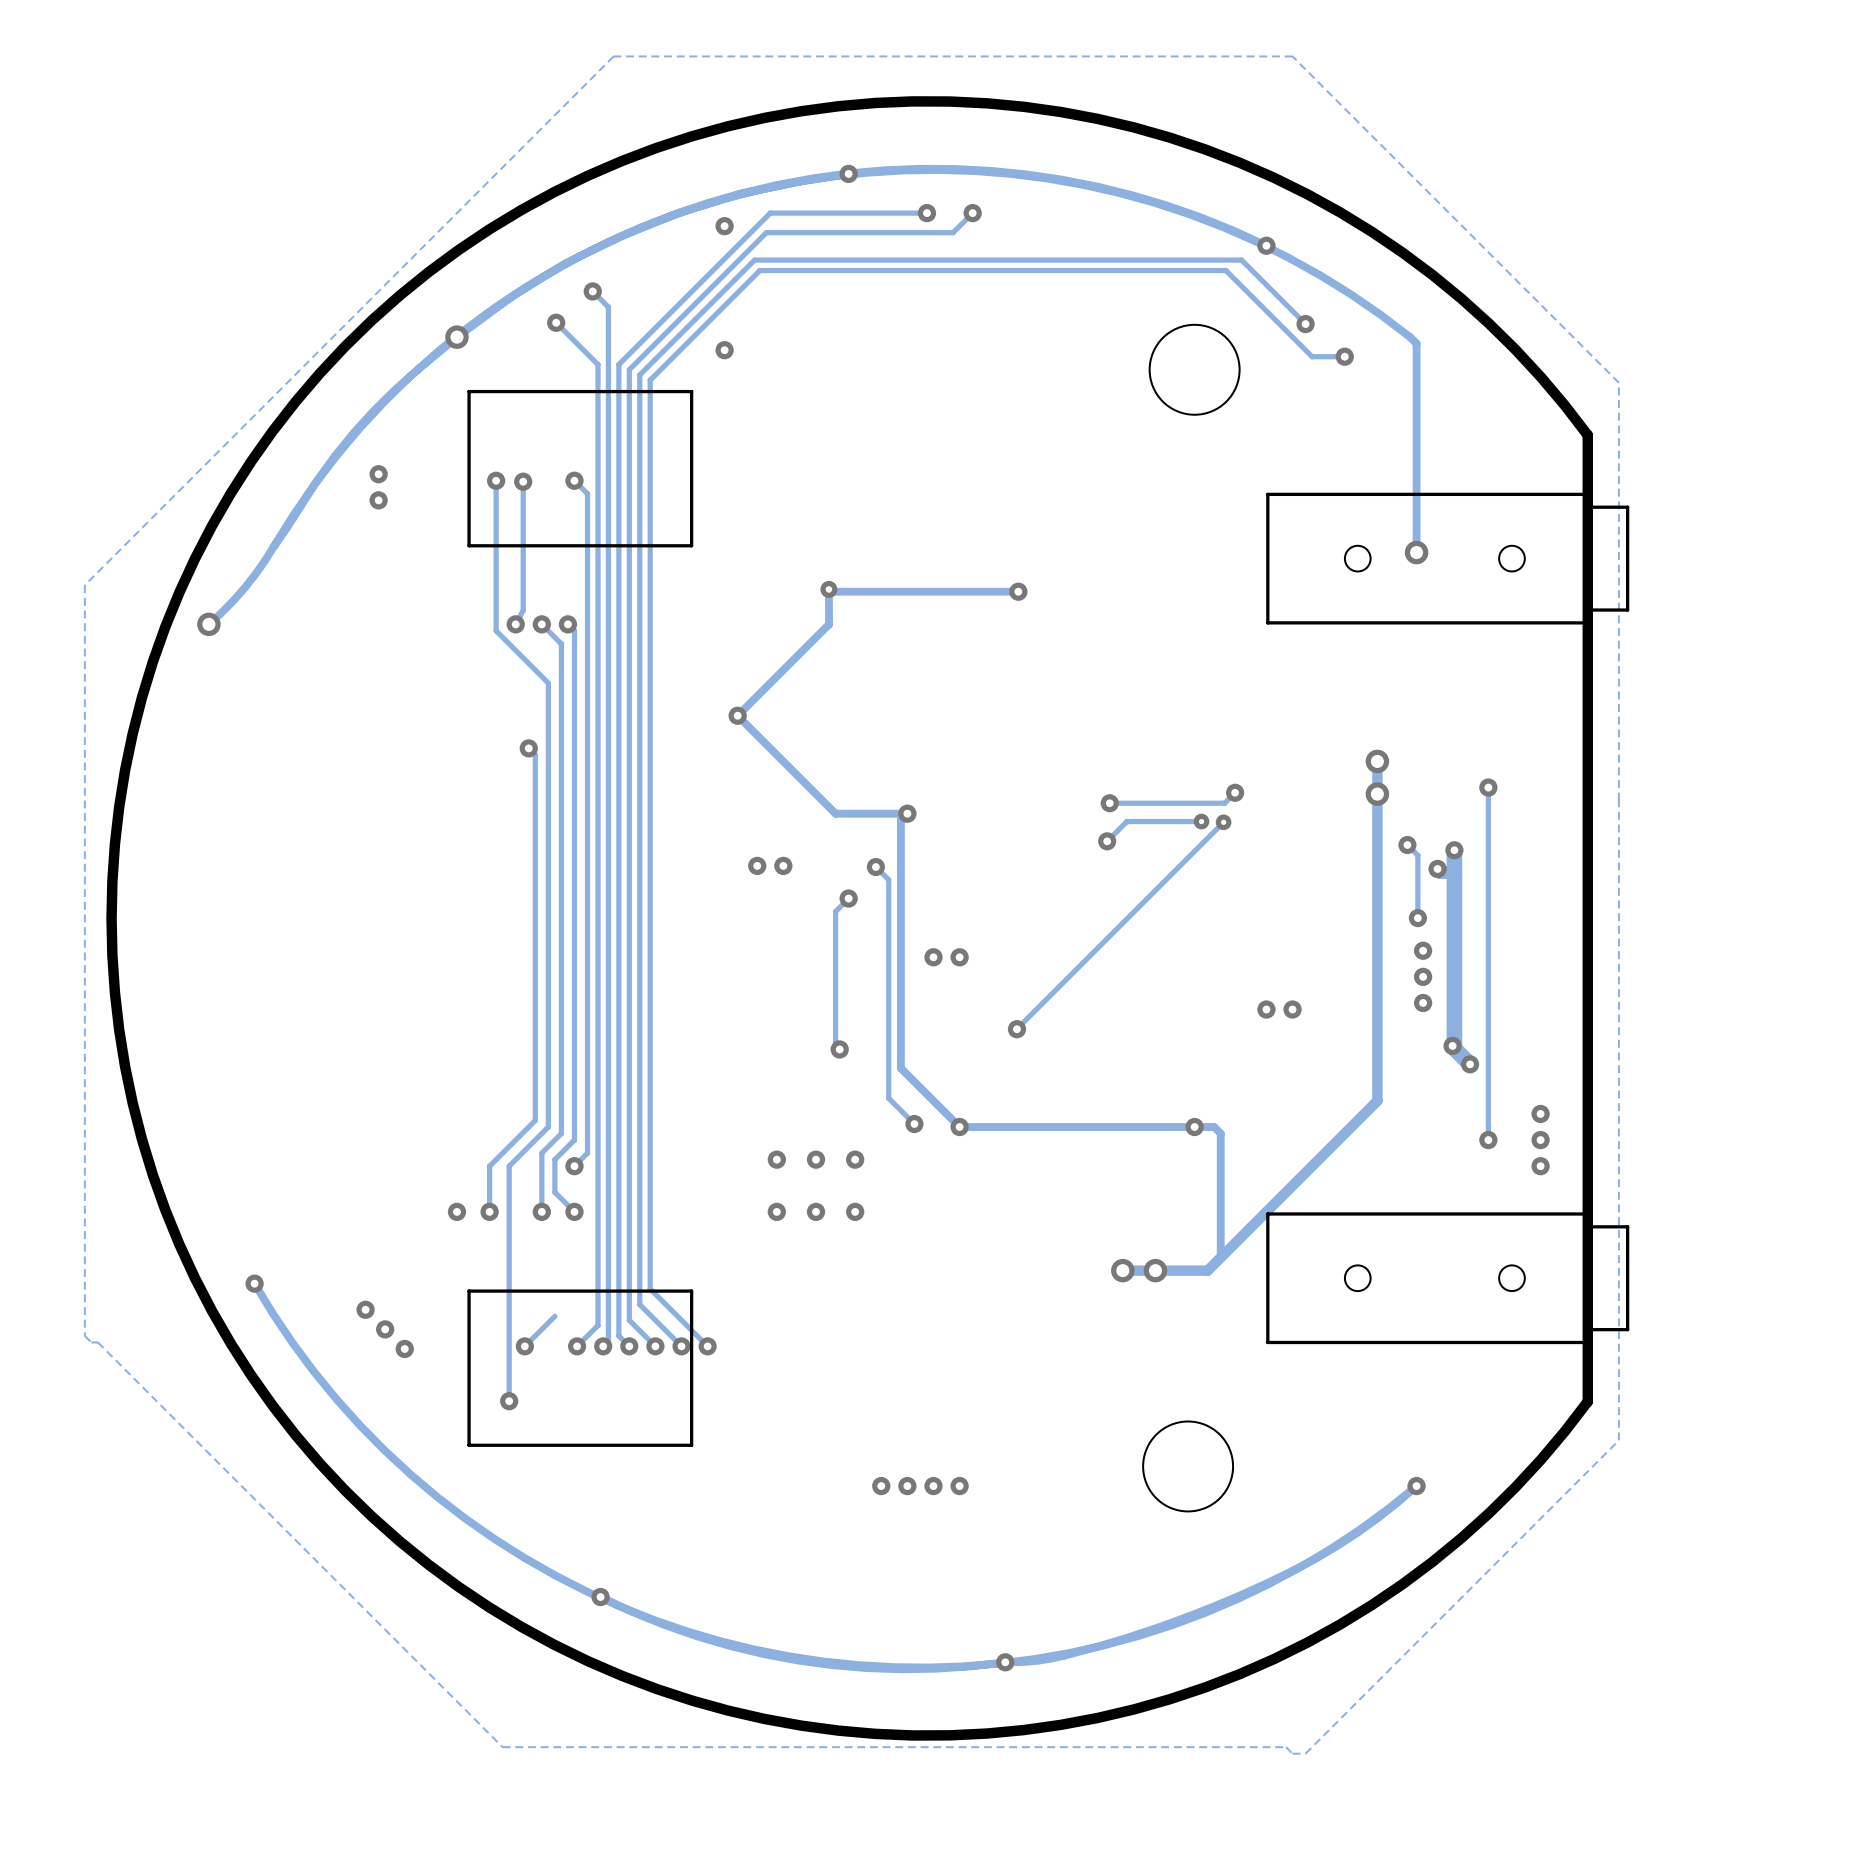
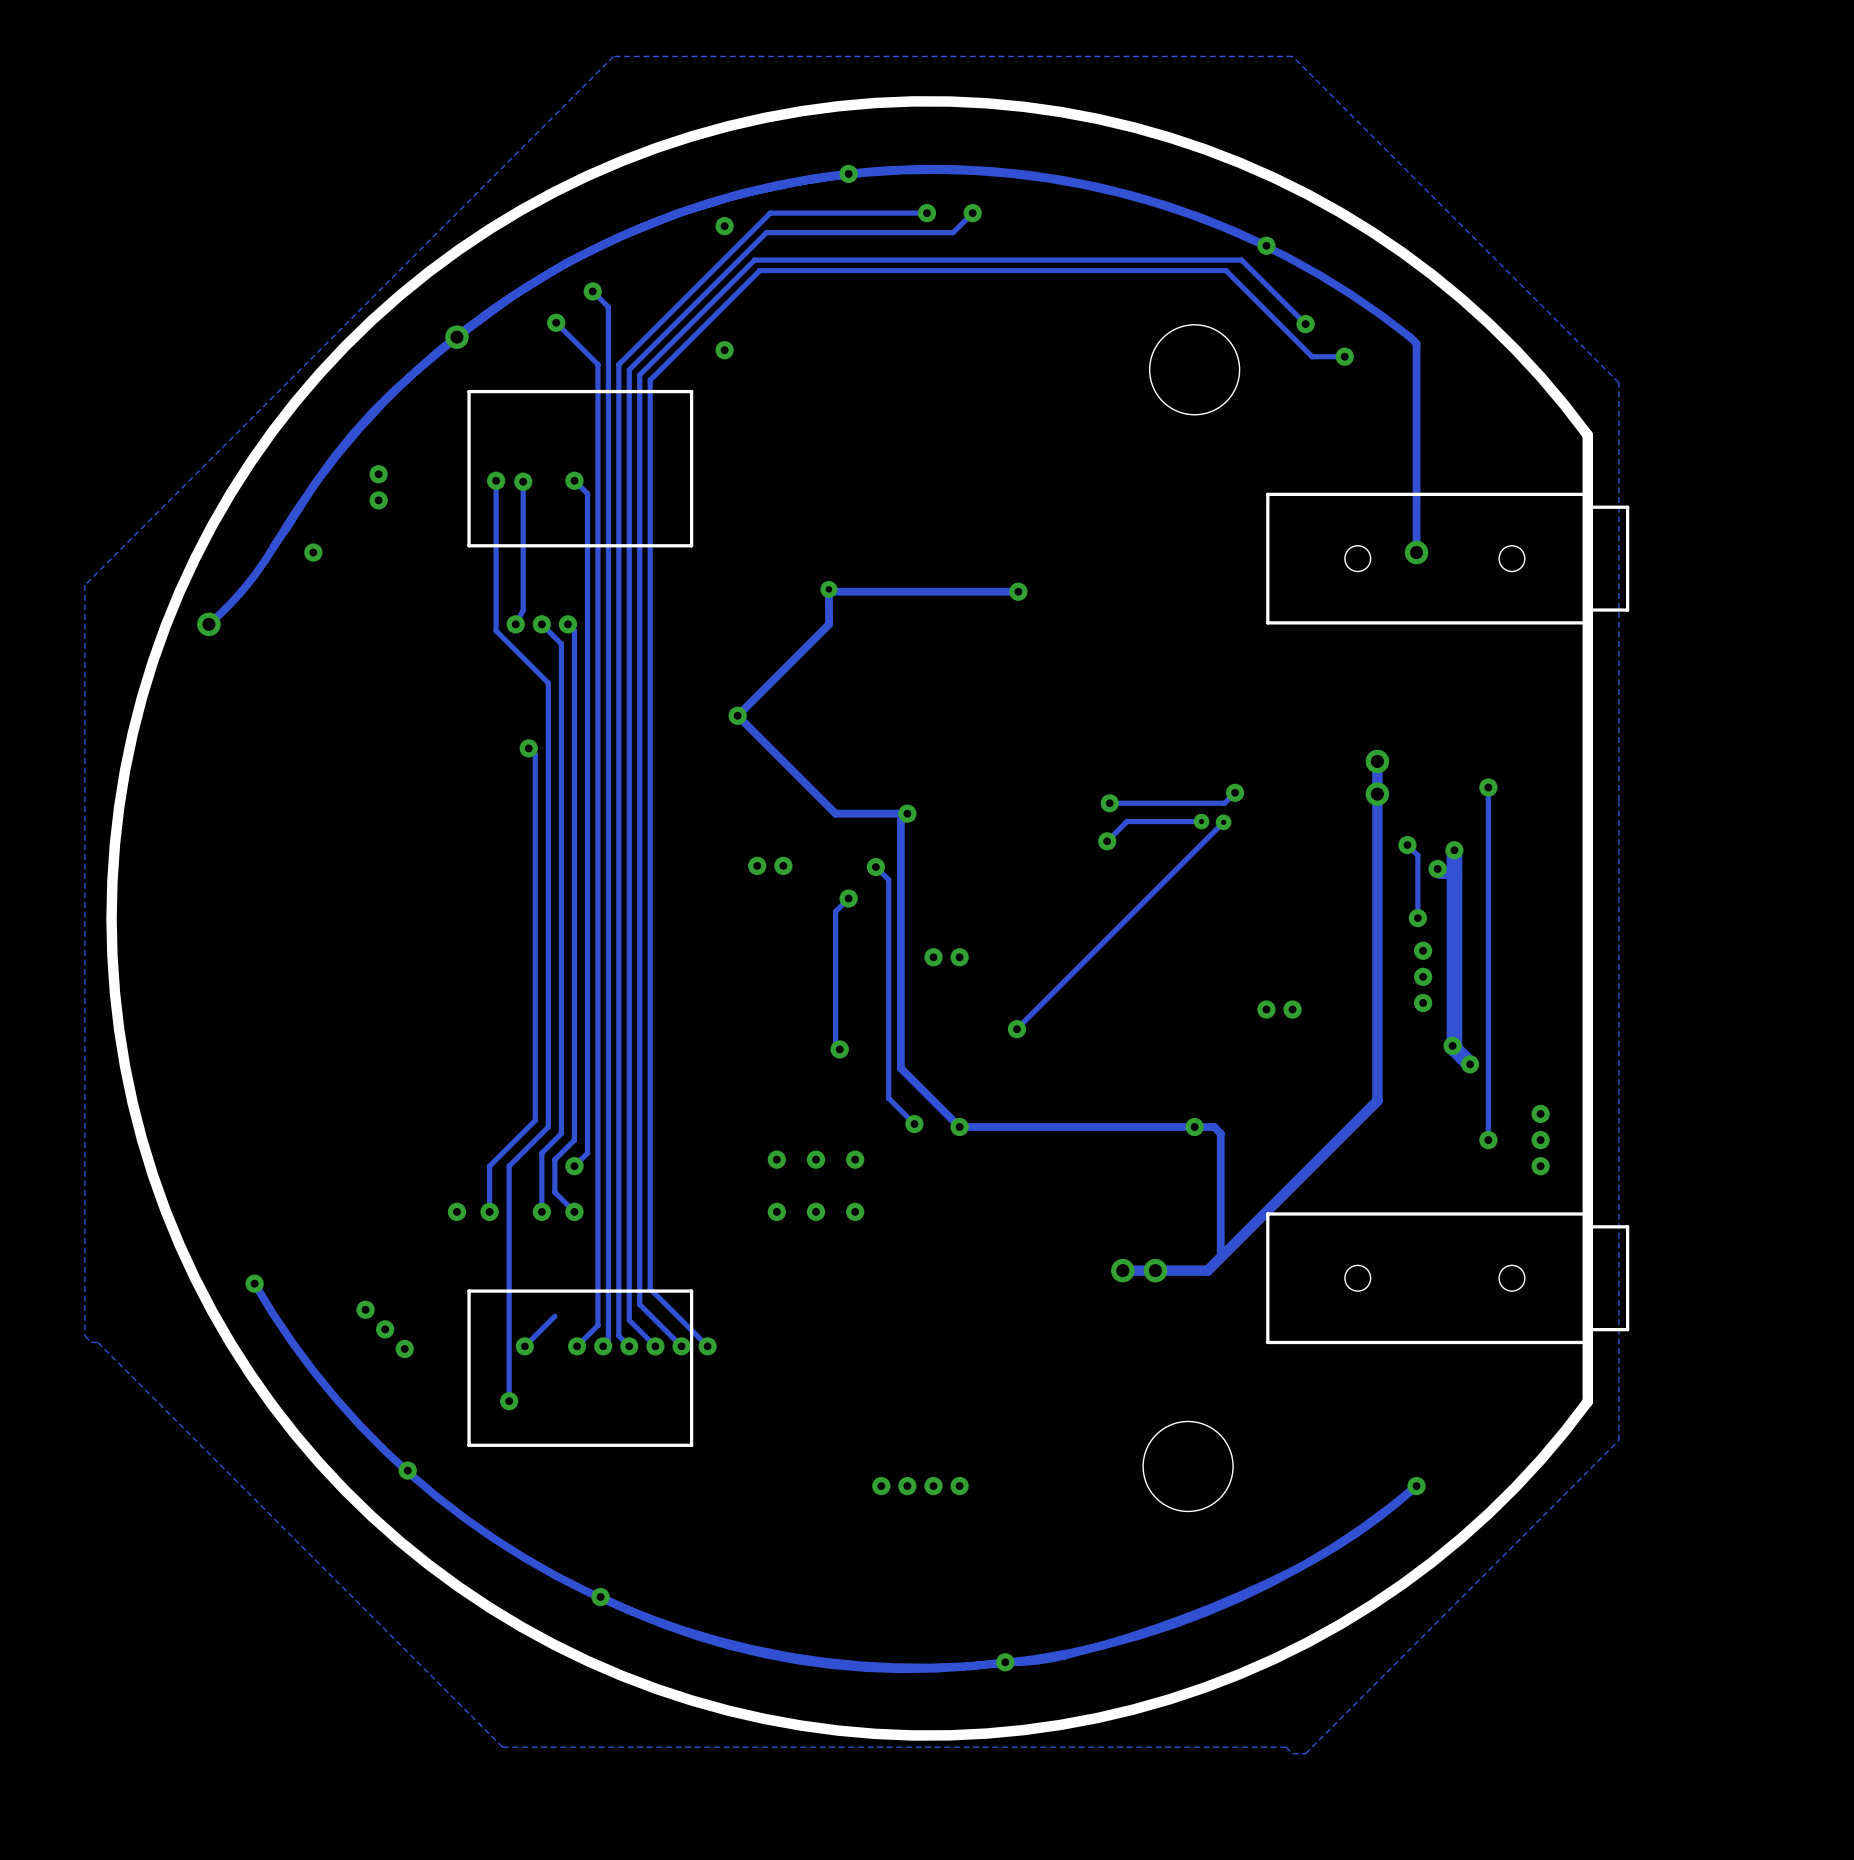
via: none -> (313, 552)
via: none -> (407, 1470)

